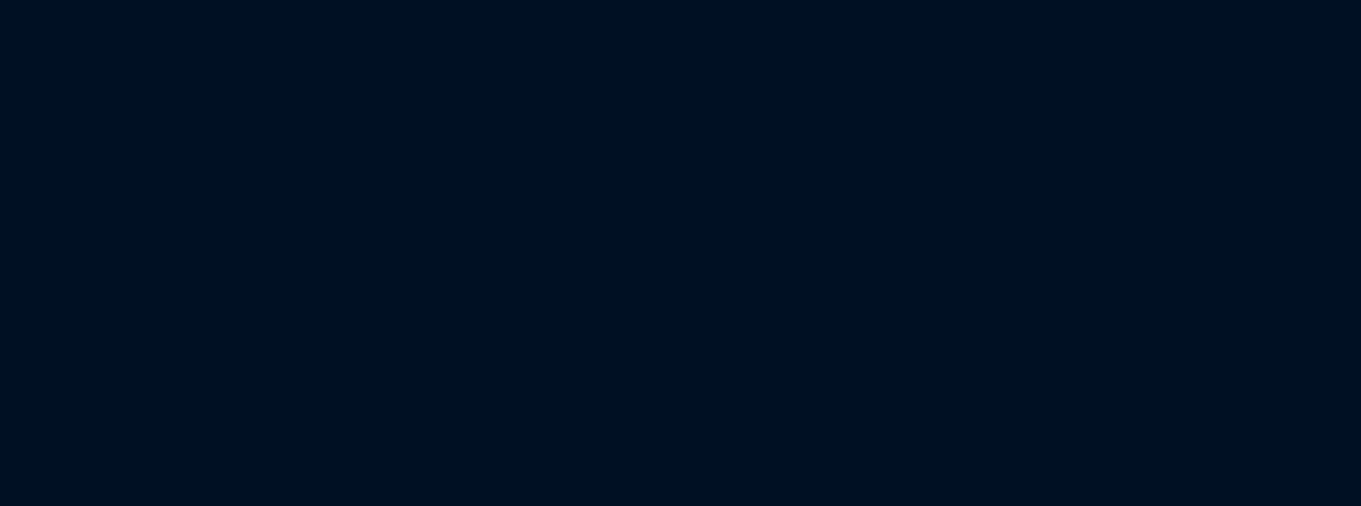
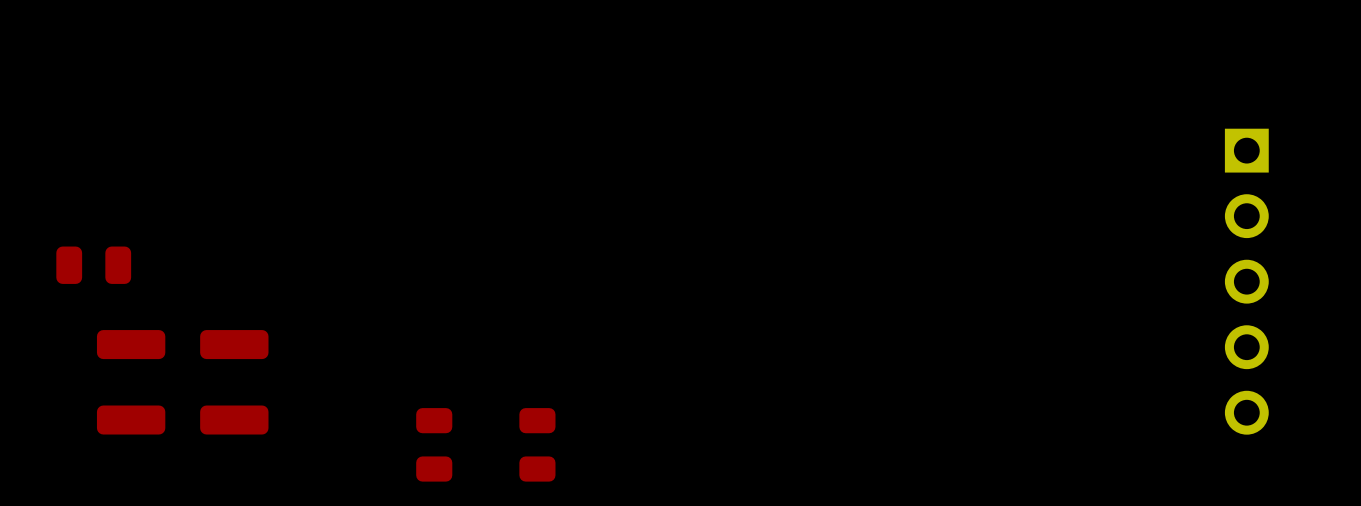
part: none -> (93, 265)
part: none -> (1246, 281)
part: none -> (131, 382)
part: none -> (234, 382)
part: none -> (434, 444)
part: none -> (537, 444)

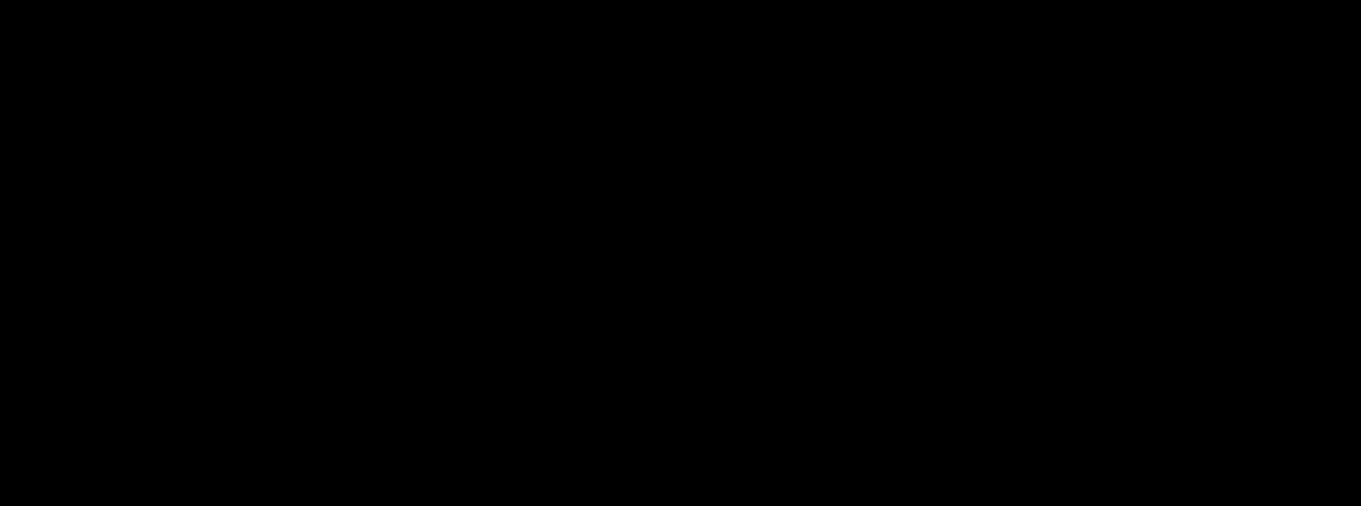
part: (93, 265) -> none
part: (1246, 281) -> none
part: (131, 382) -> none
part: (234, 382) -> none
part: (434, 444) -> none
part: (537, 444) -> none

